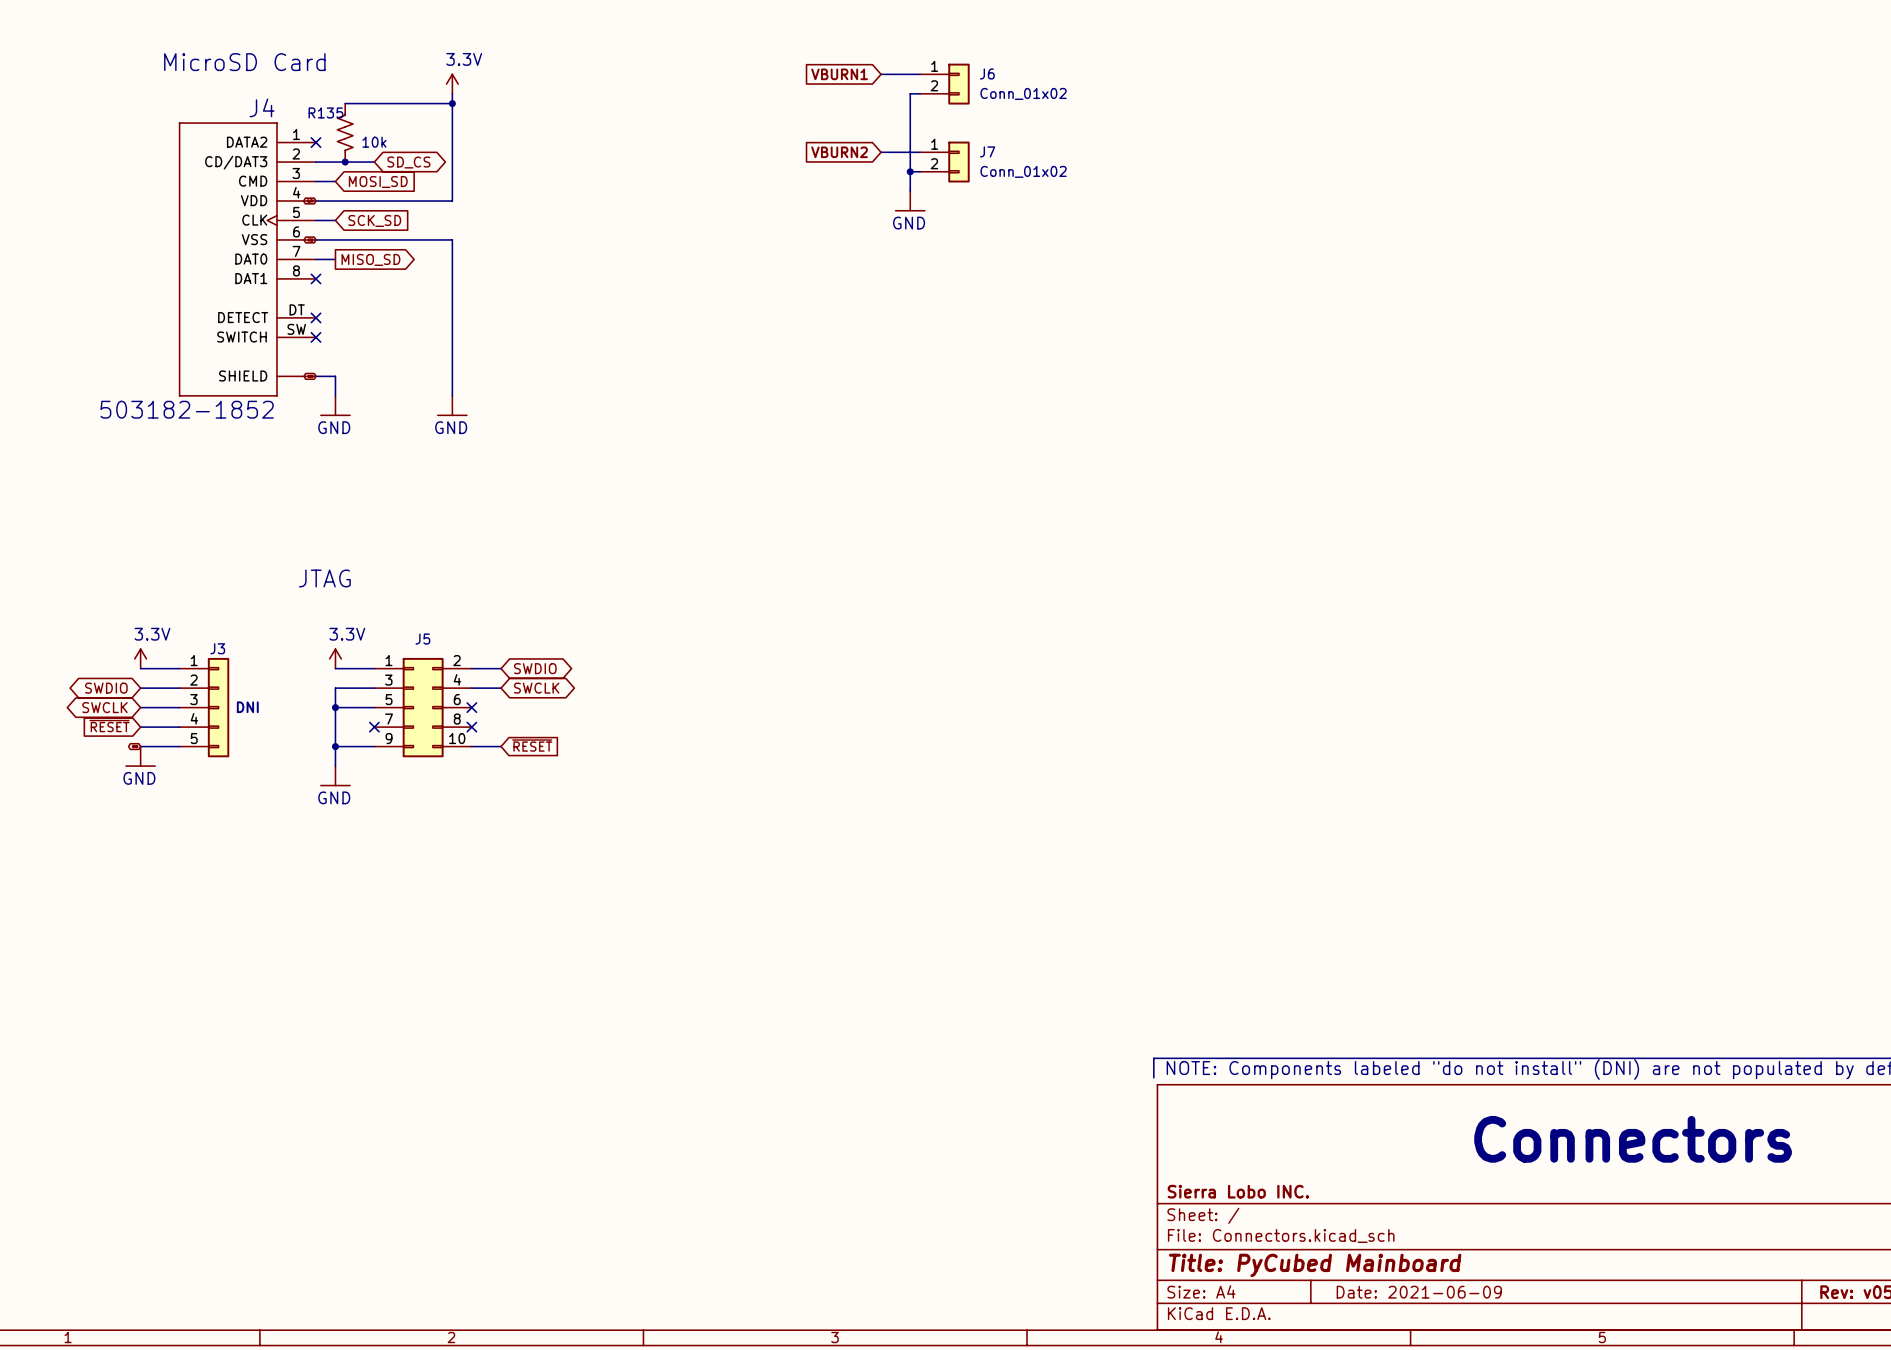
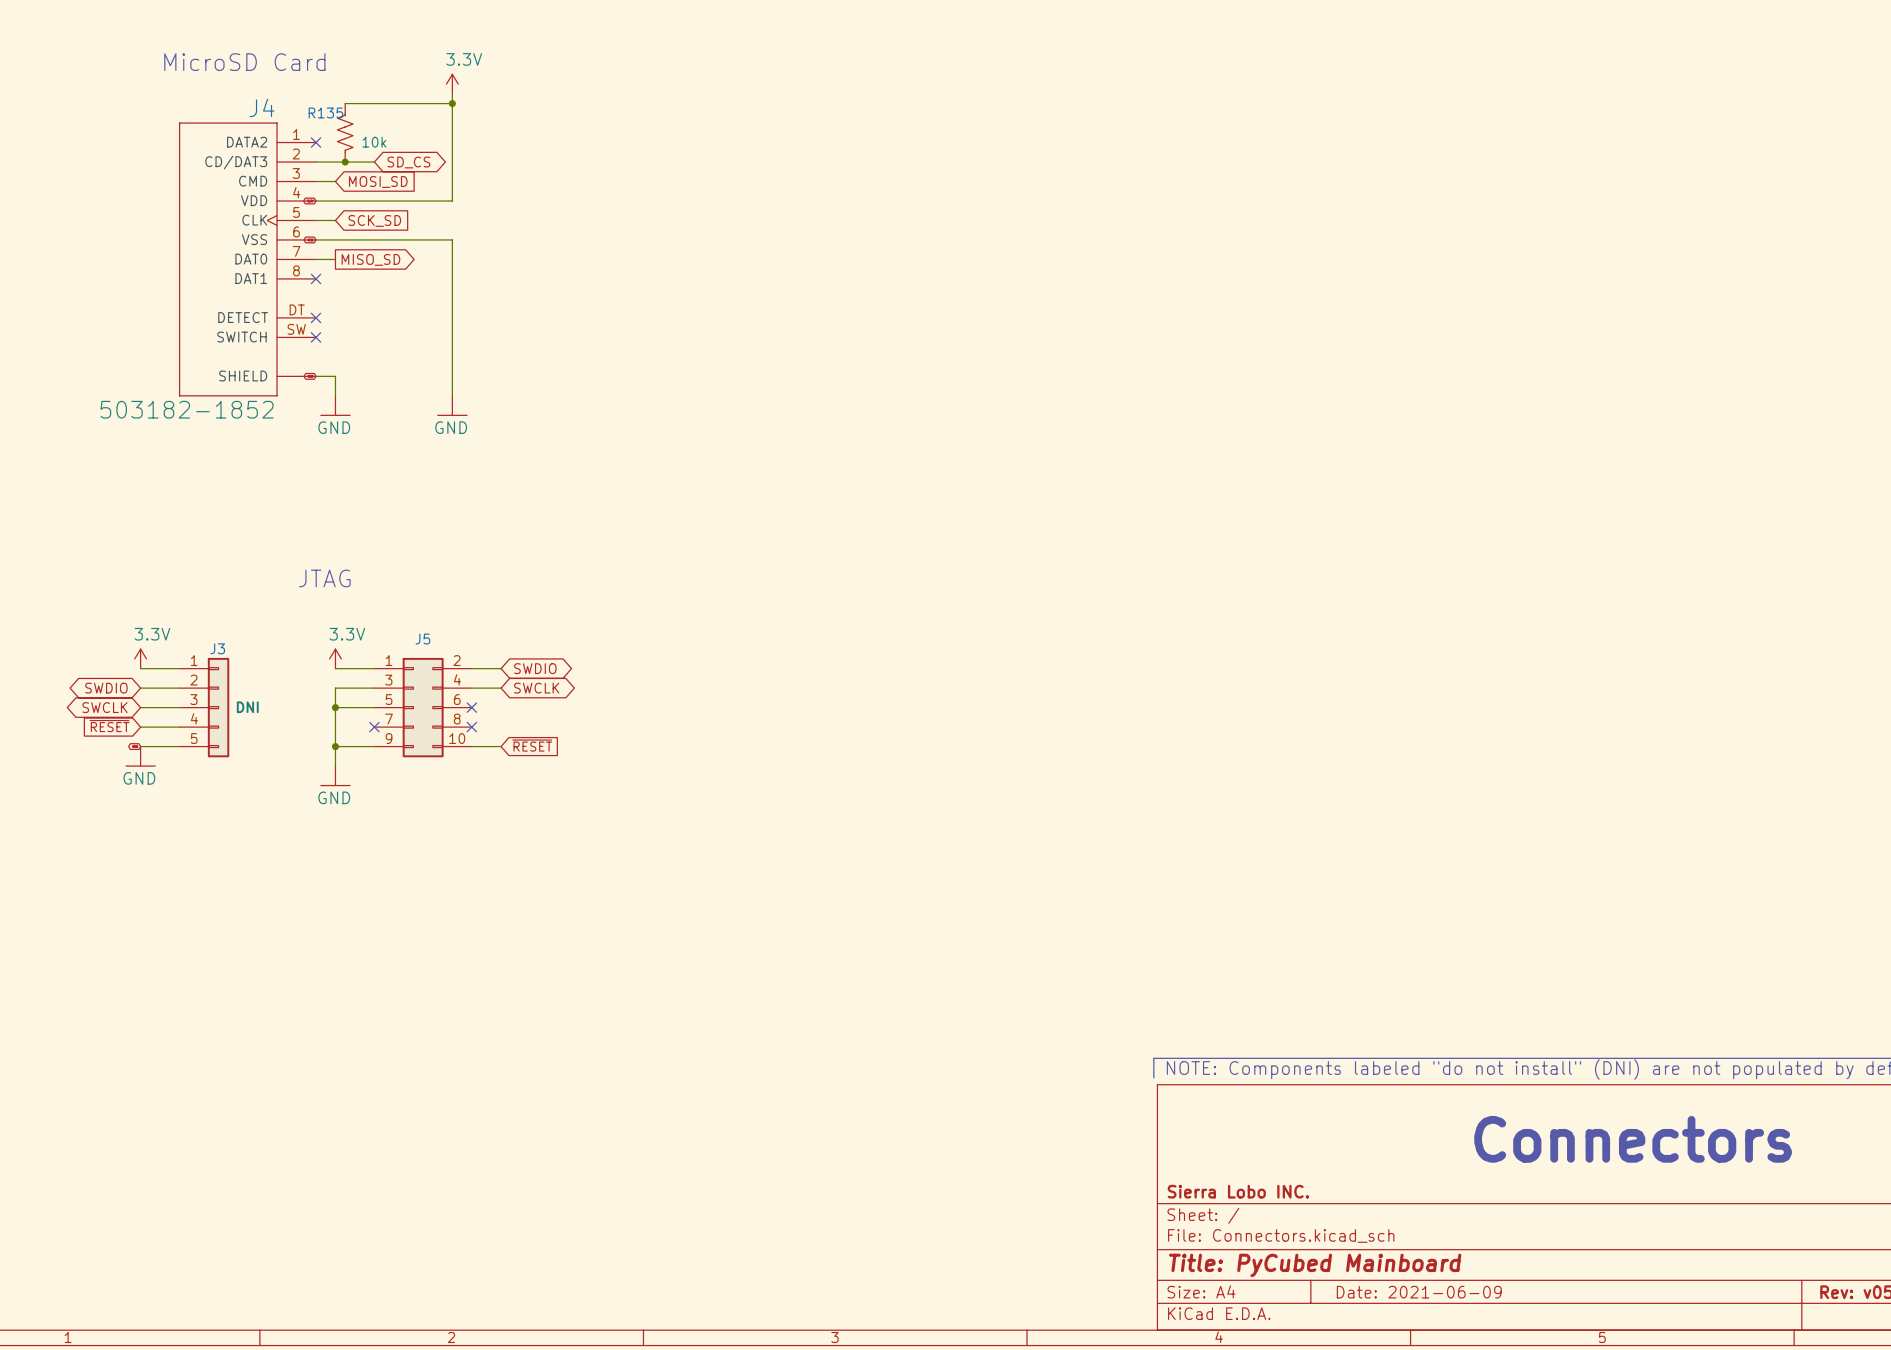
global label: VBURN1 (839, 74) -> none
wire: (881, 74) (920, 74) -> none
J6: Conn_01x02 (944, 84) -> none
wire: (920, 93) (910, 93) (910, 191) -> none
global label: VBURN2 (839, 152) -> none
wire: (881, 152) (920, 152) -> none
J7: Conn_01x02 (944, 162) -> none
wire: (910, 171) (920, 171) -> none
junction: (910, 171) -> none
power symbol: GND (910, 201) -> none

